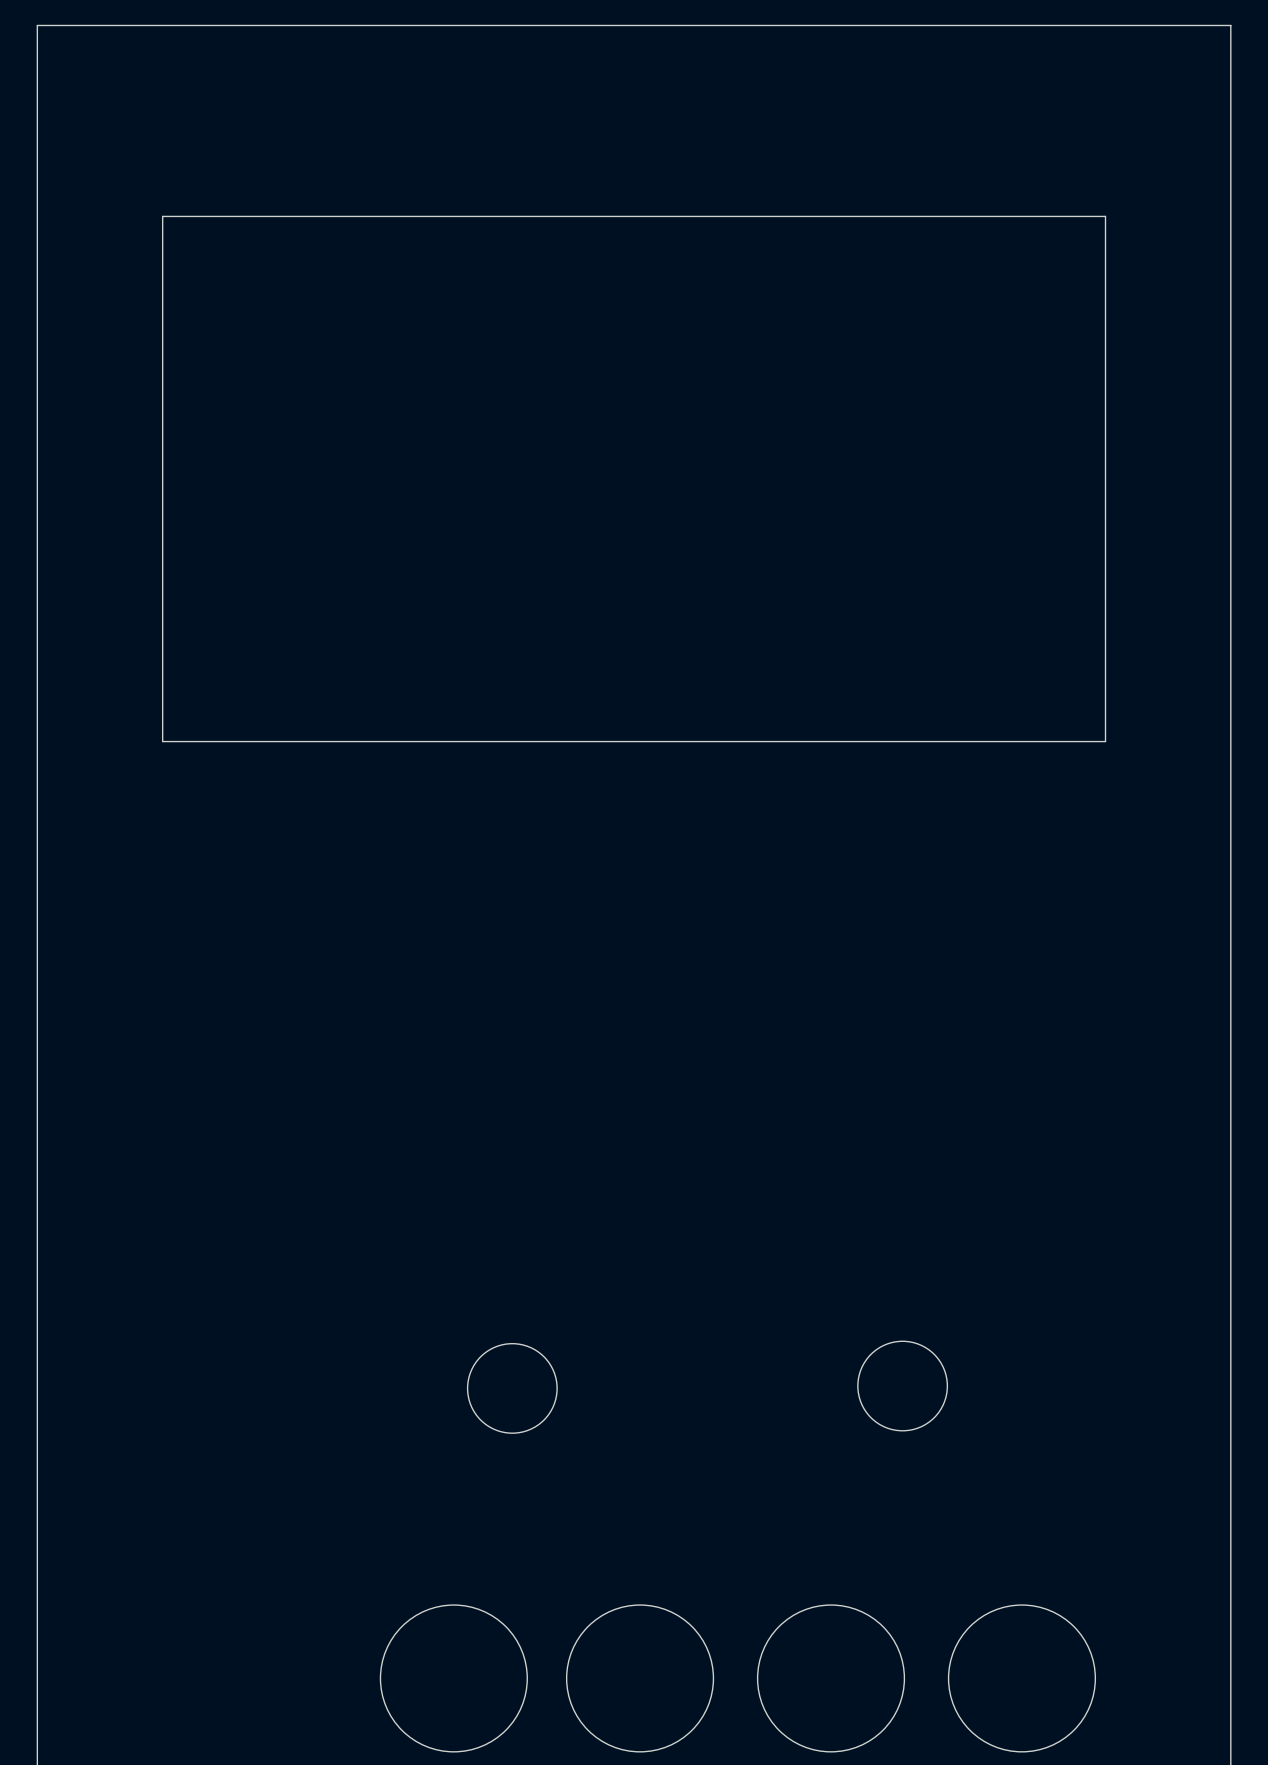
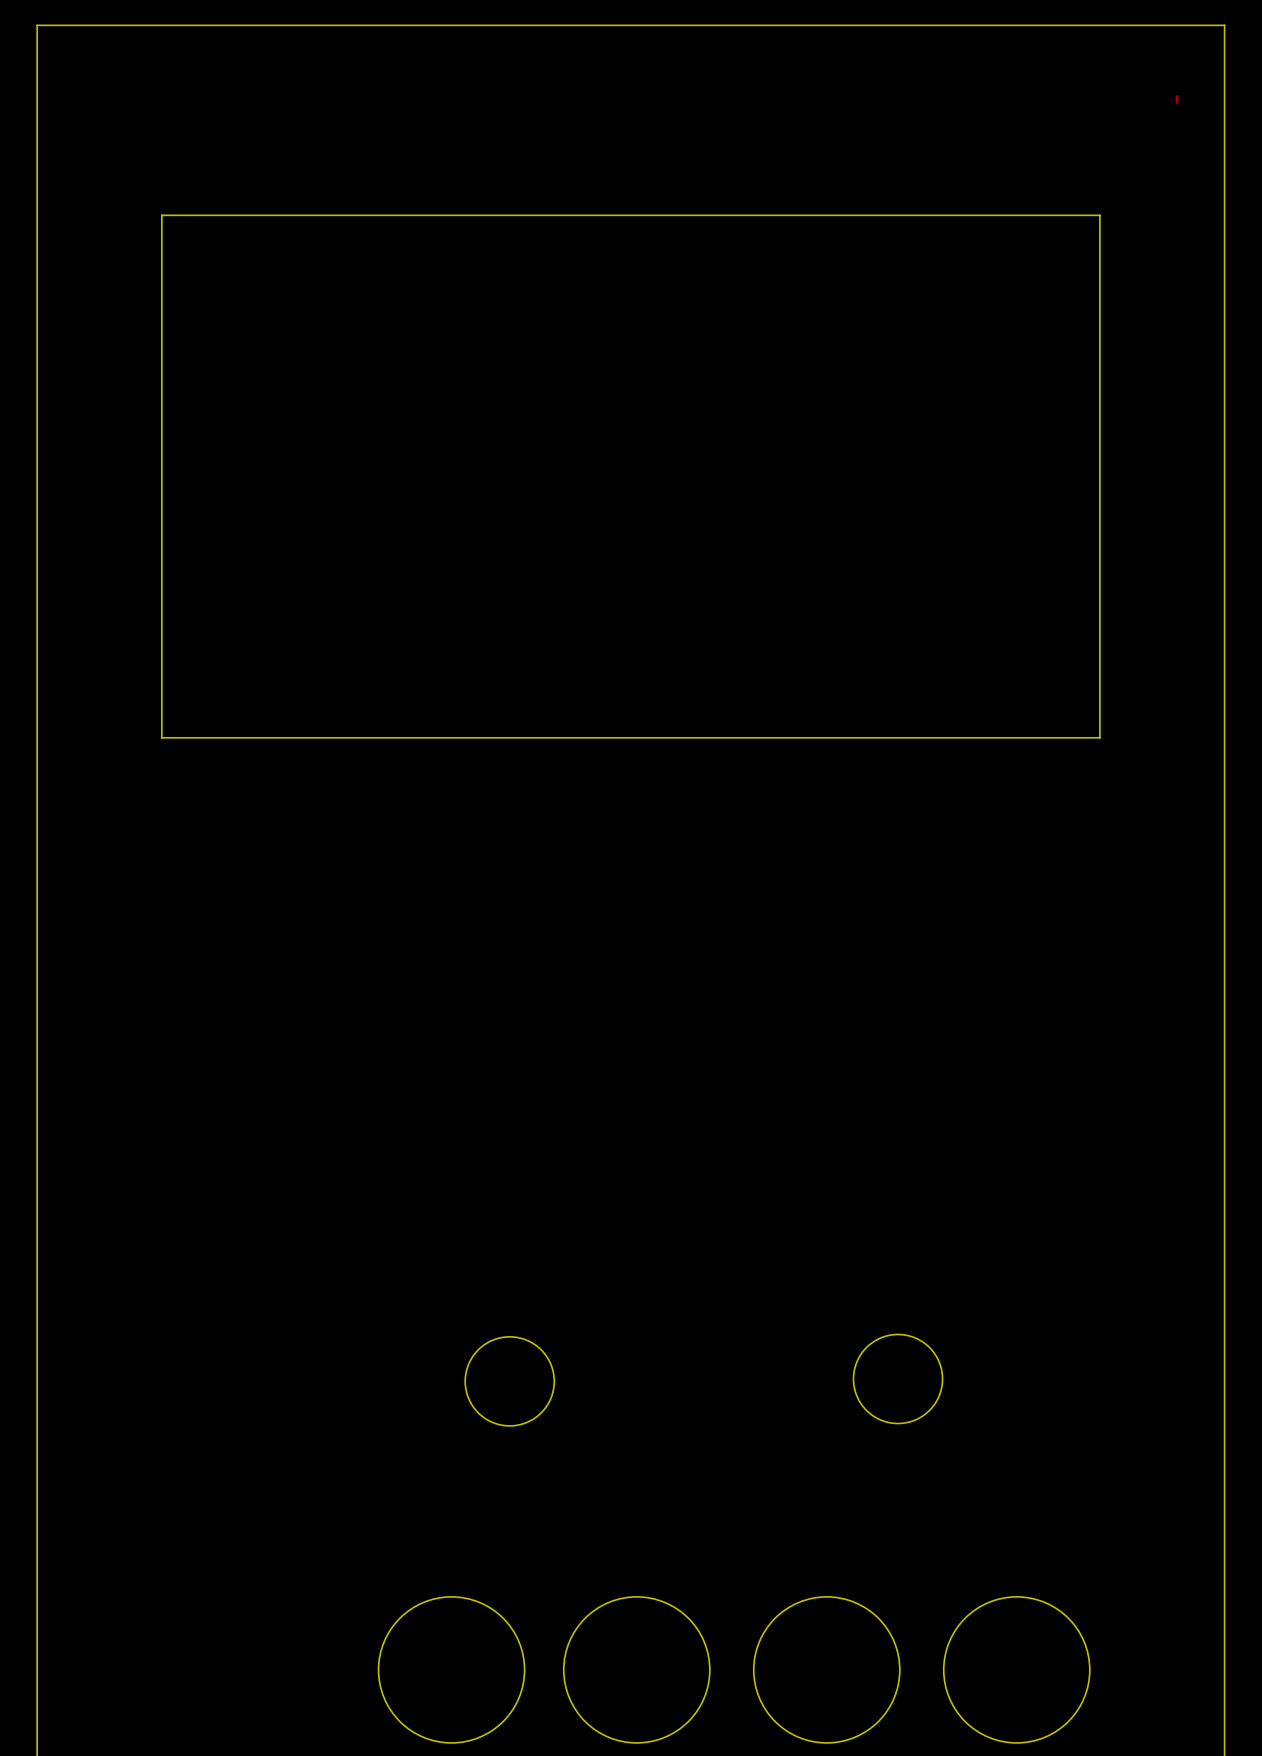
track: none -> (1177, 96) (1177, 102)

